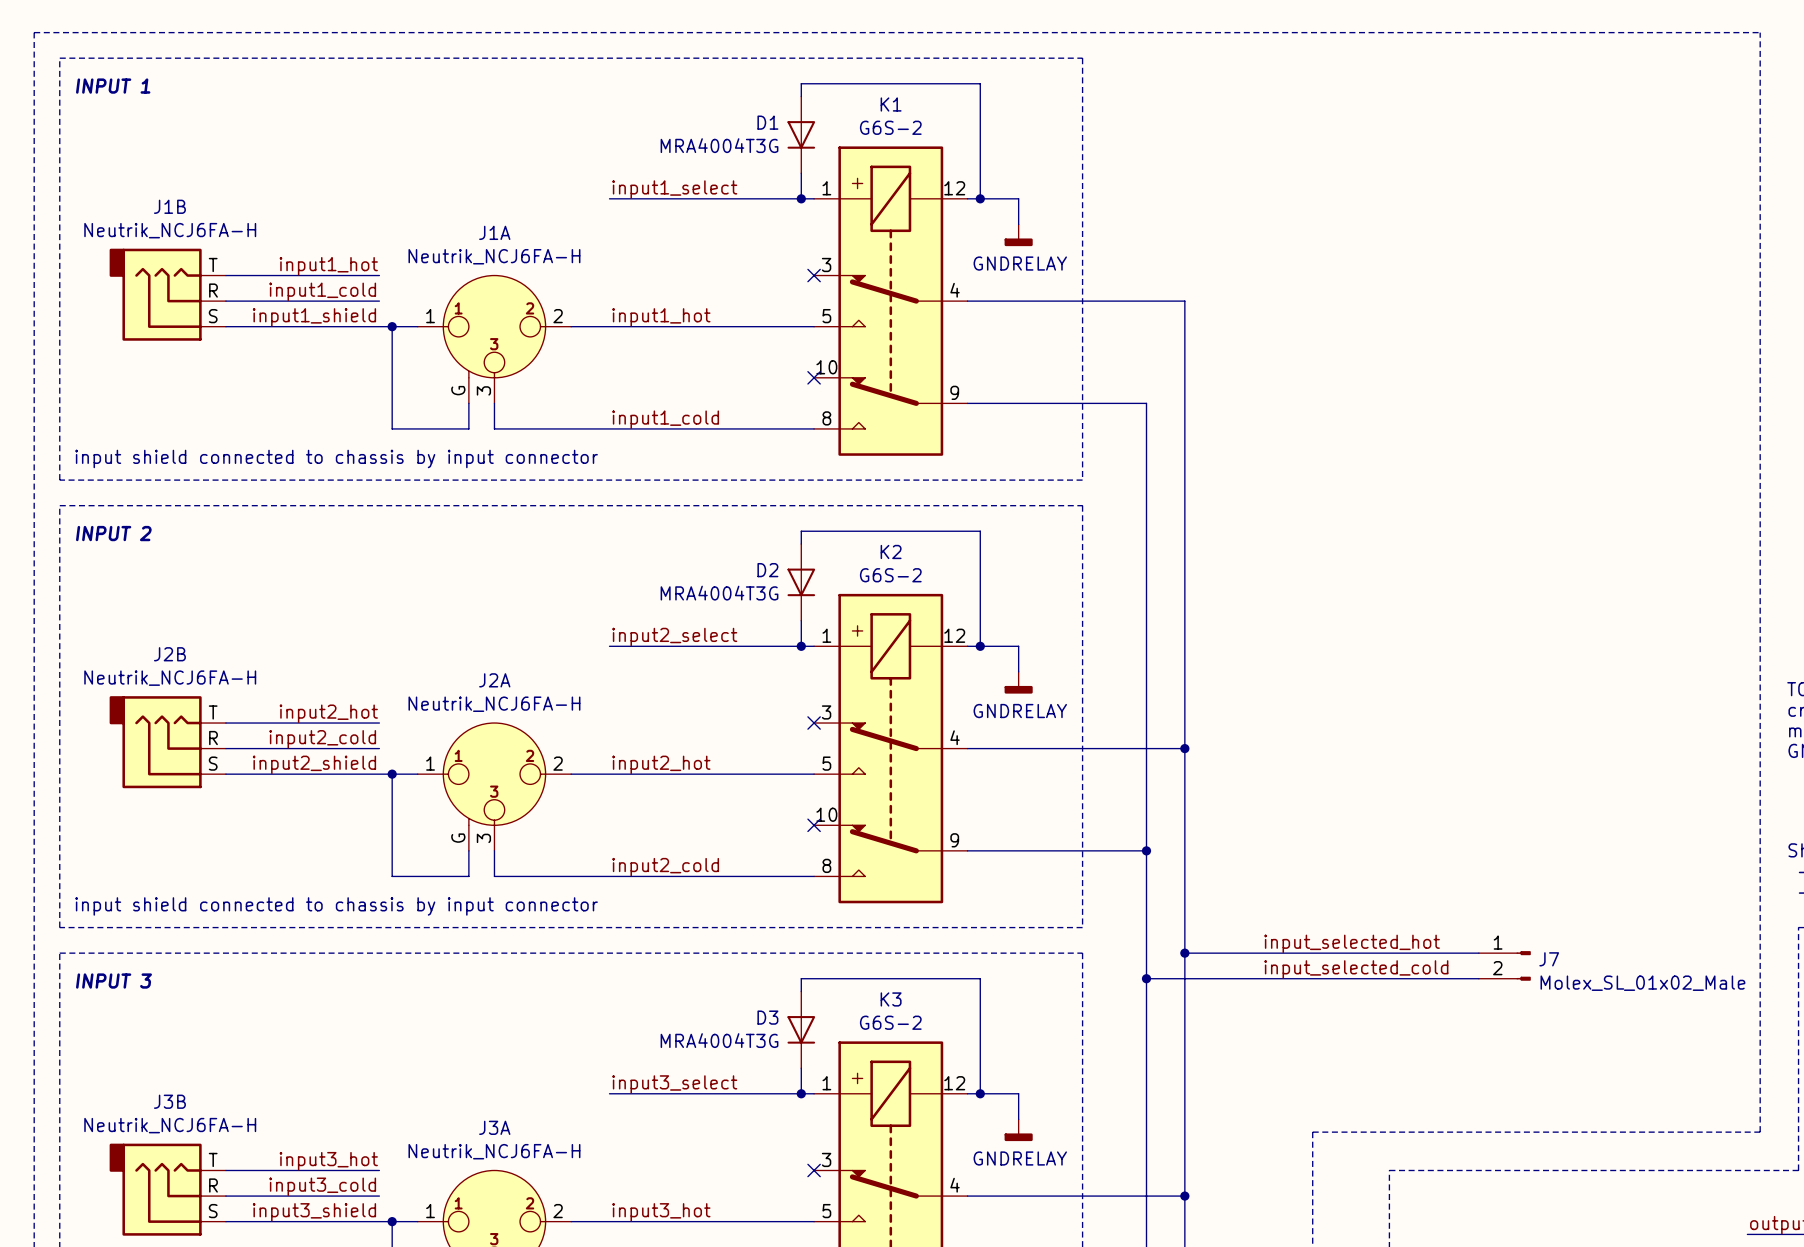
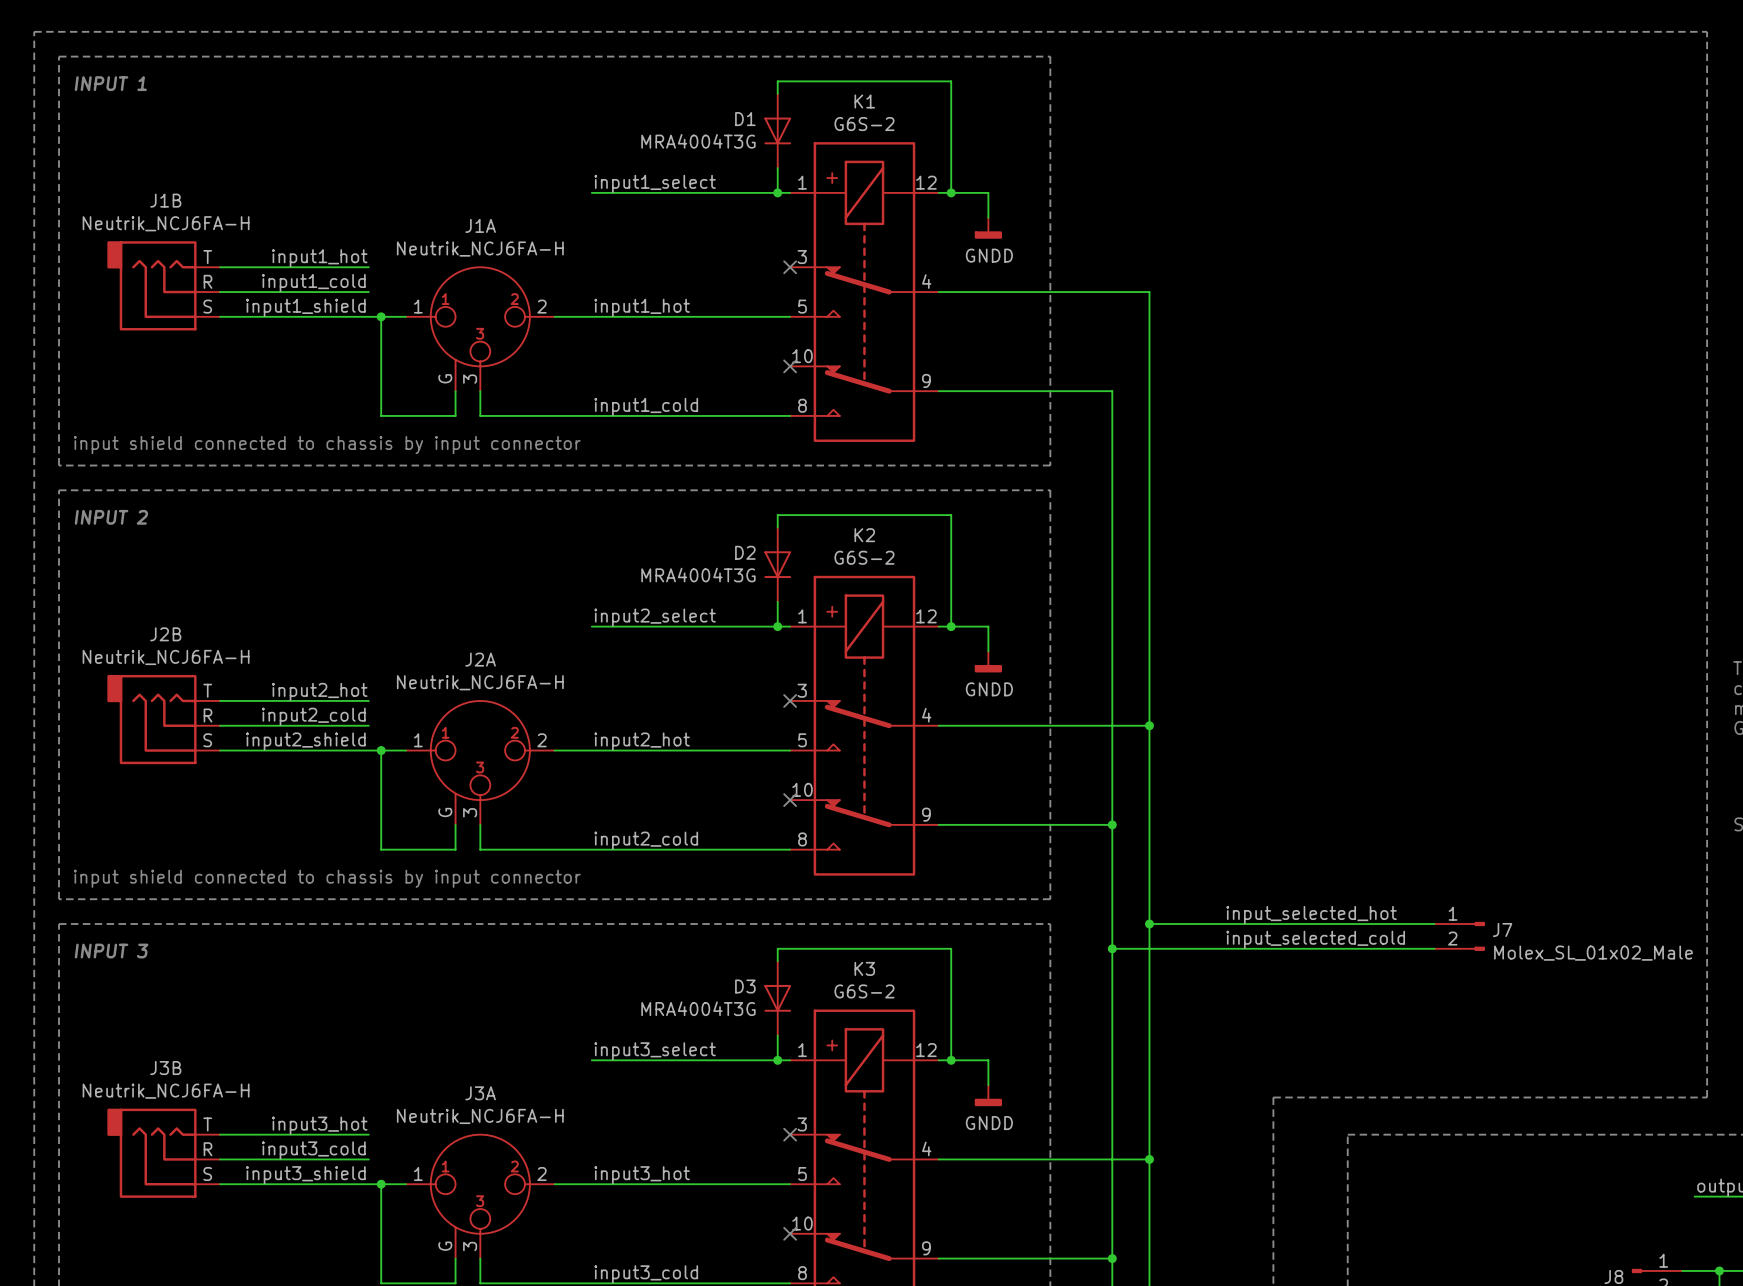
power symbol: GNDRELAY (1018, 235) -> GNDD (988, 228)
power symbol: GNDRELAY (1018, 682) -> GNDD (988, 661)
power symbol: GNDRELAY (1018, 1130) -> GNDD (988, 1095)

